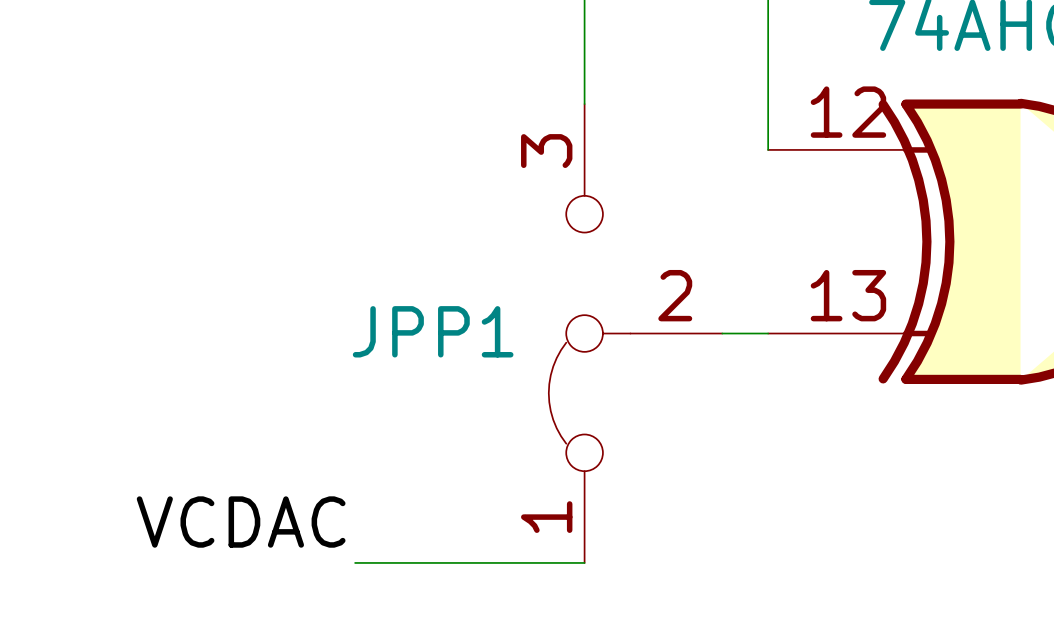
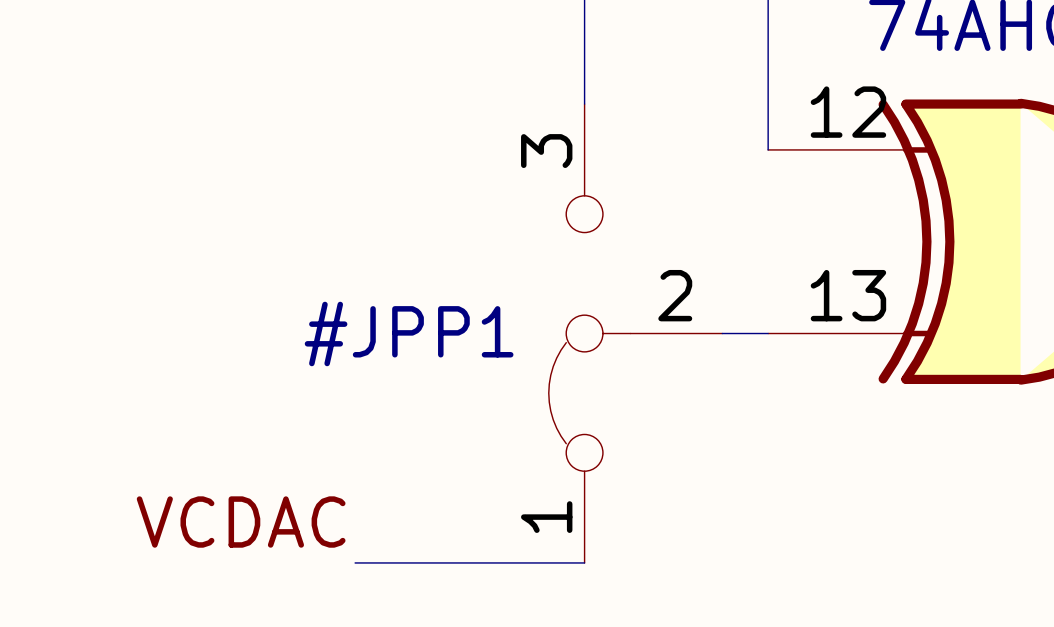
#JPP1: none -> (635, 333)

